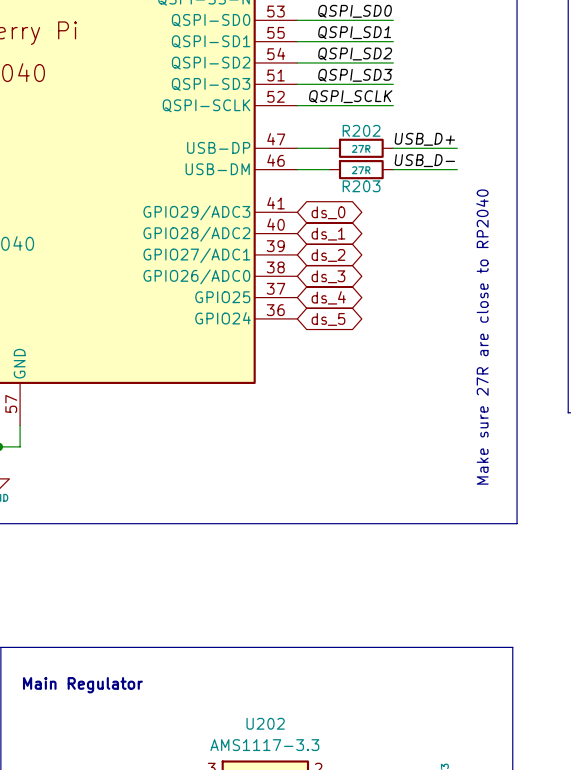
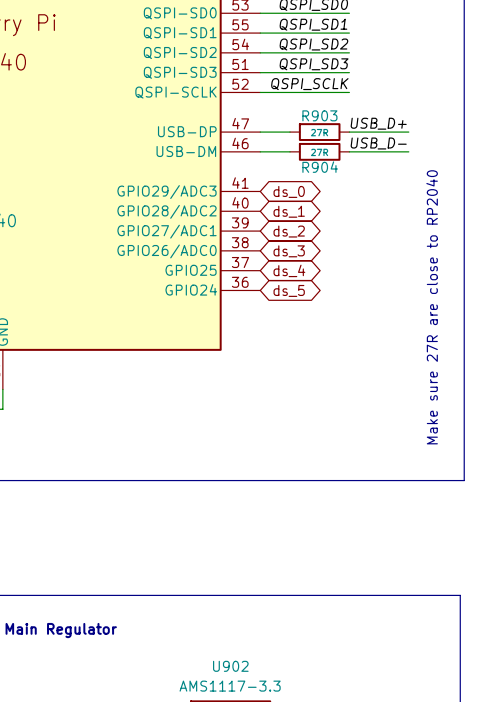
R202 name: R202 (361, 130) -> R903 (319, 115)
R203 name: R203 (361, 186) -> R904 (320, 167)
U202 name: U202 (265, 723) -> U902 (230, 666)

